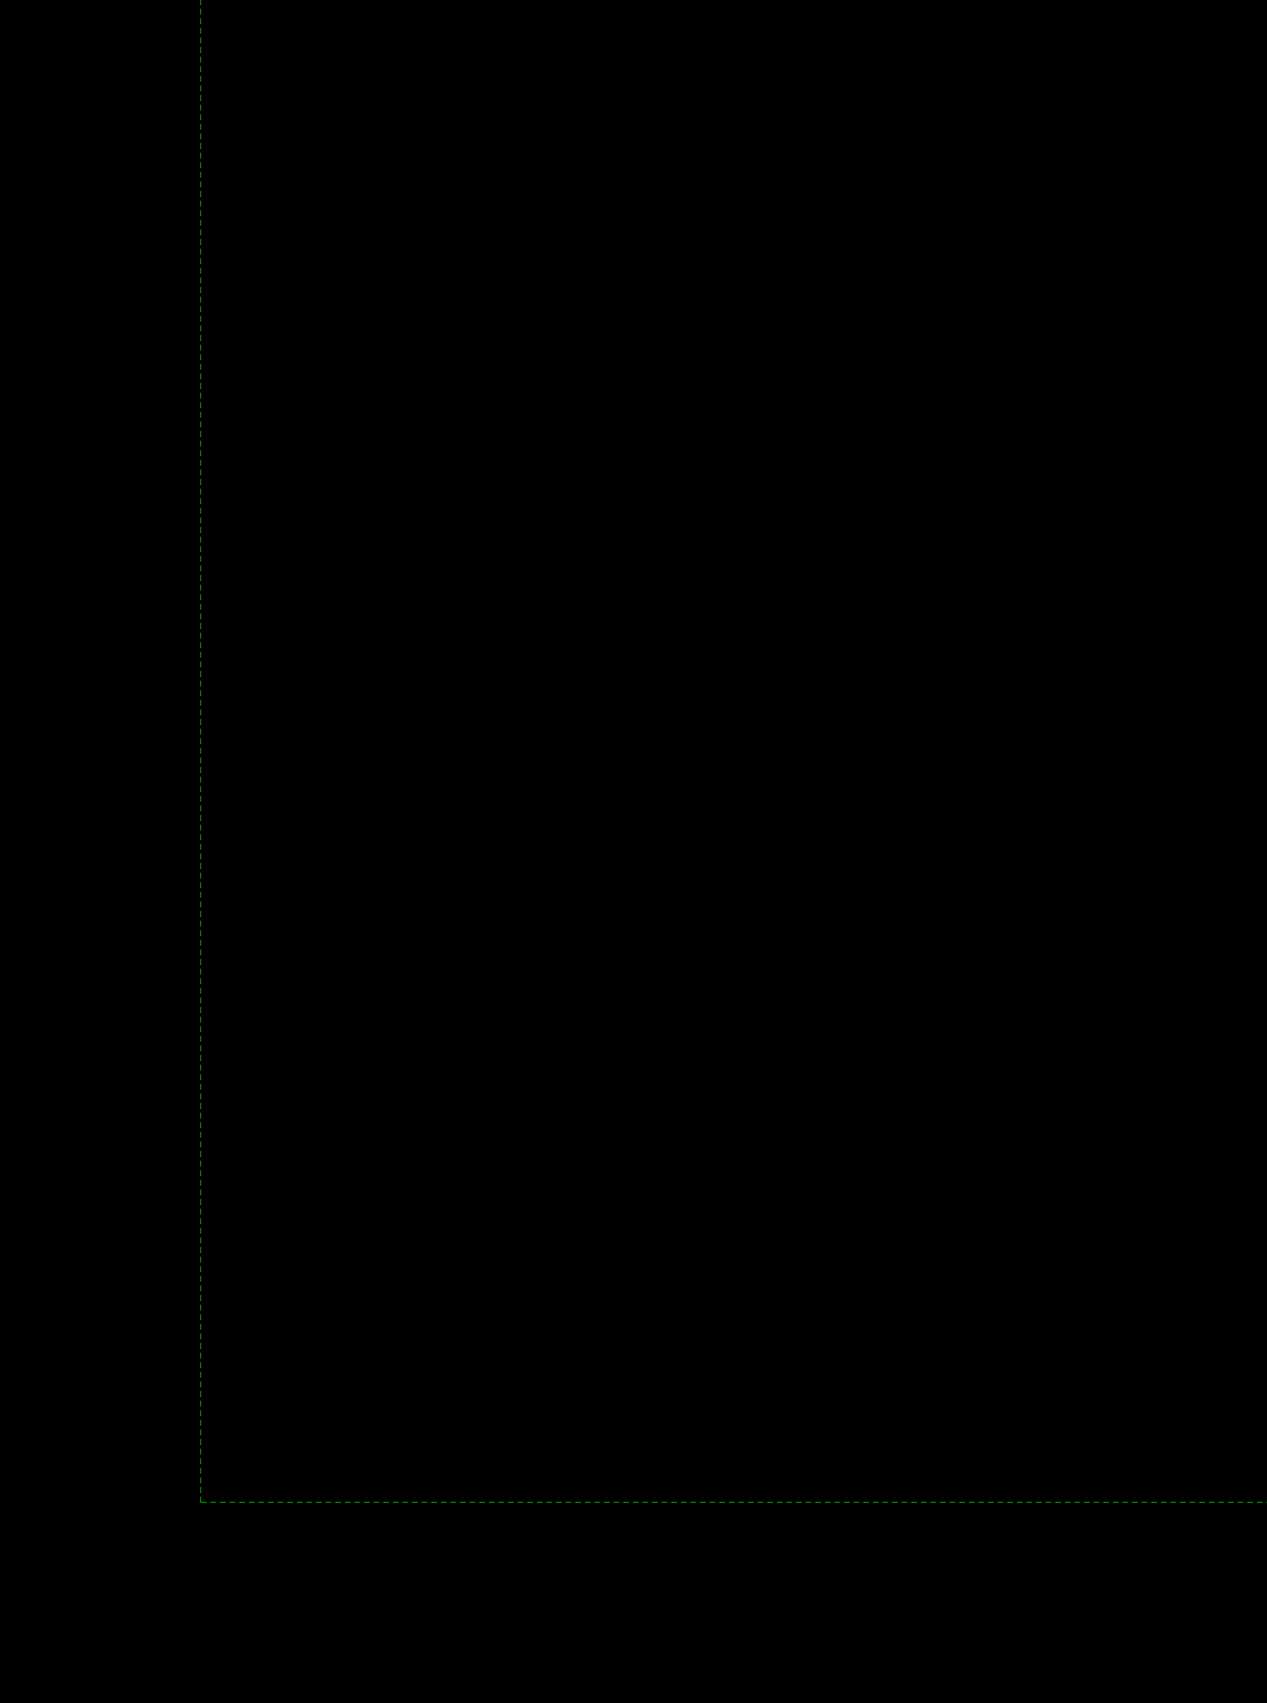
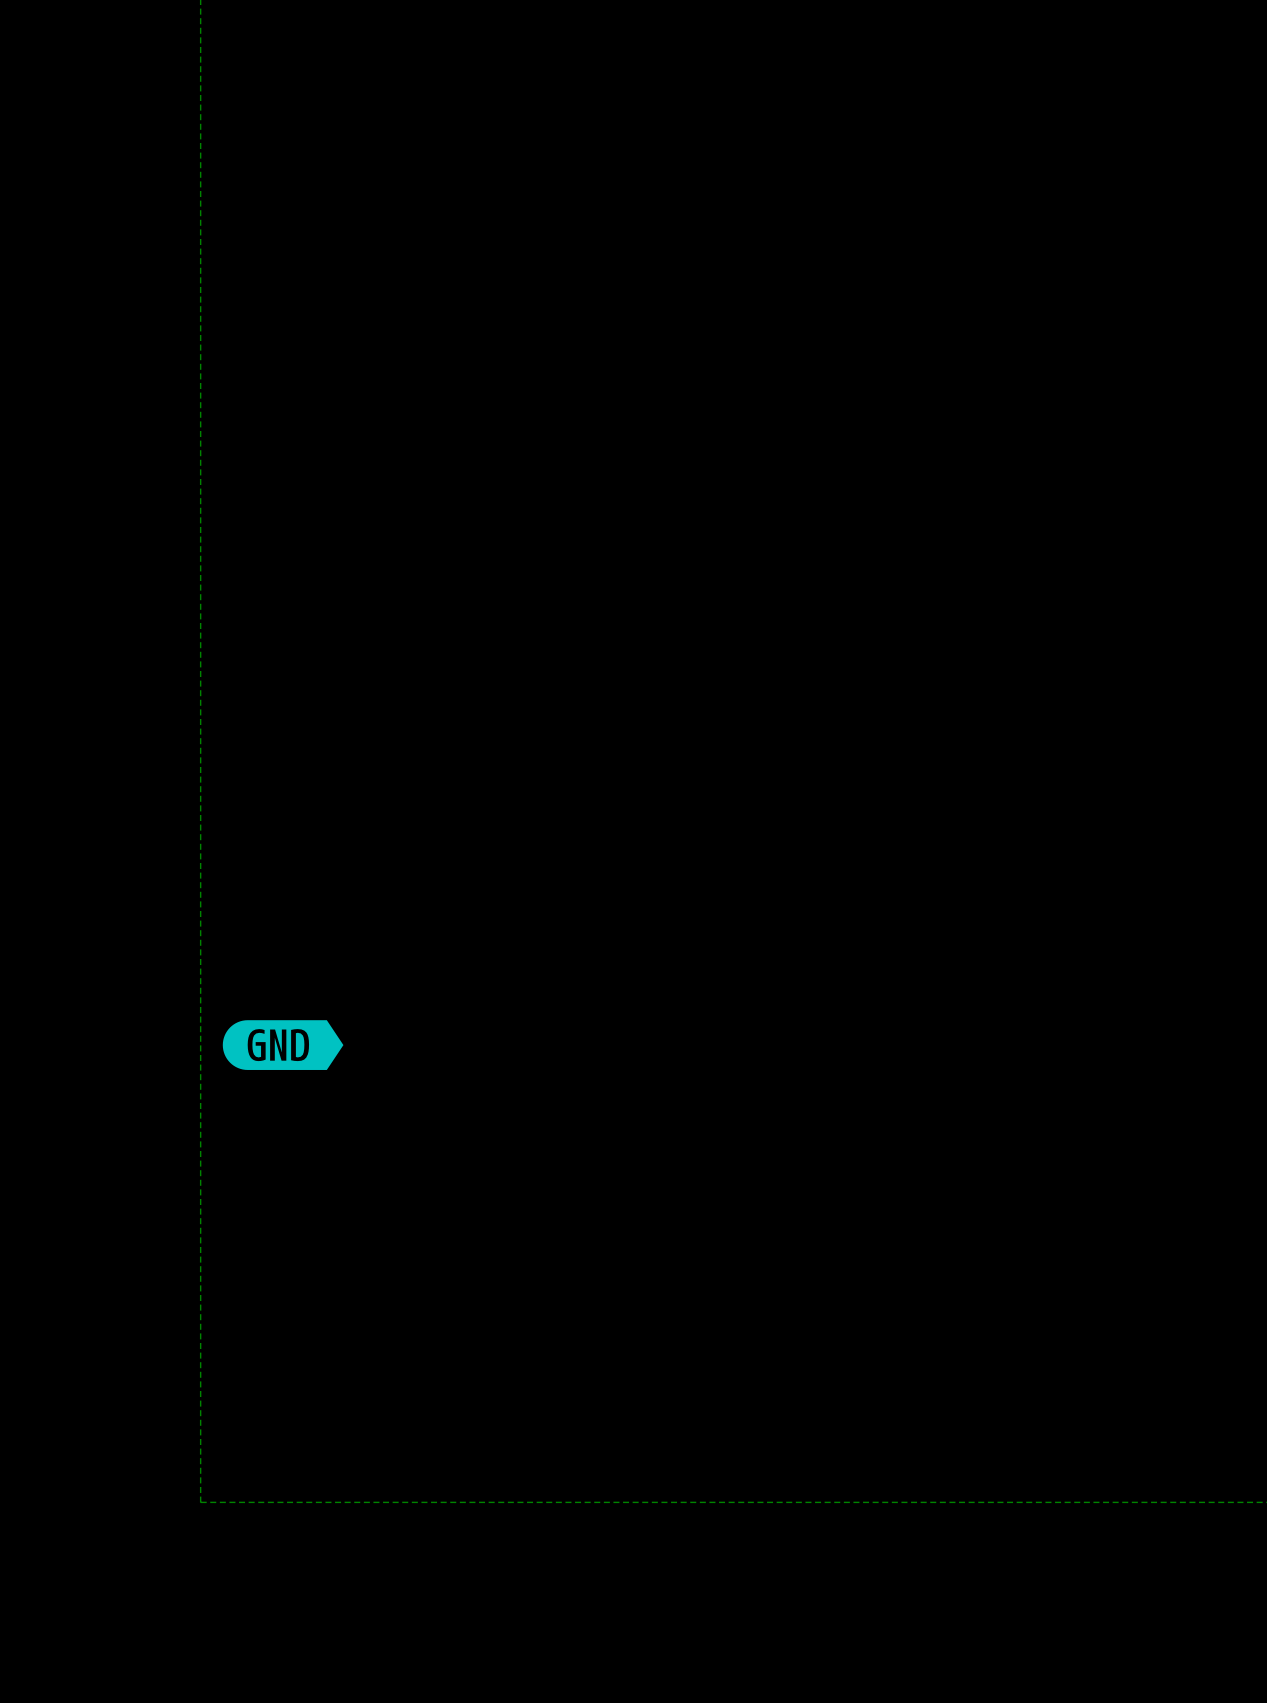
drawing: none -> [222, 1020, 344, 1070]

